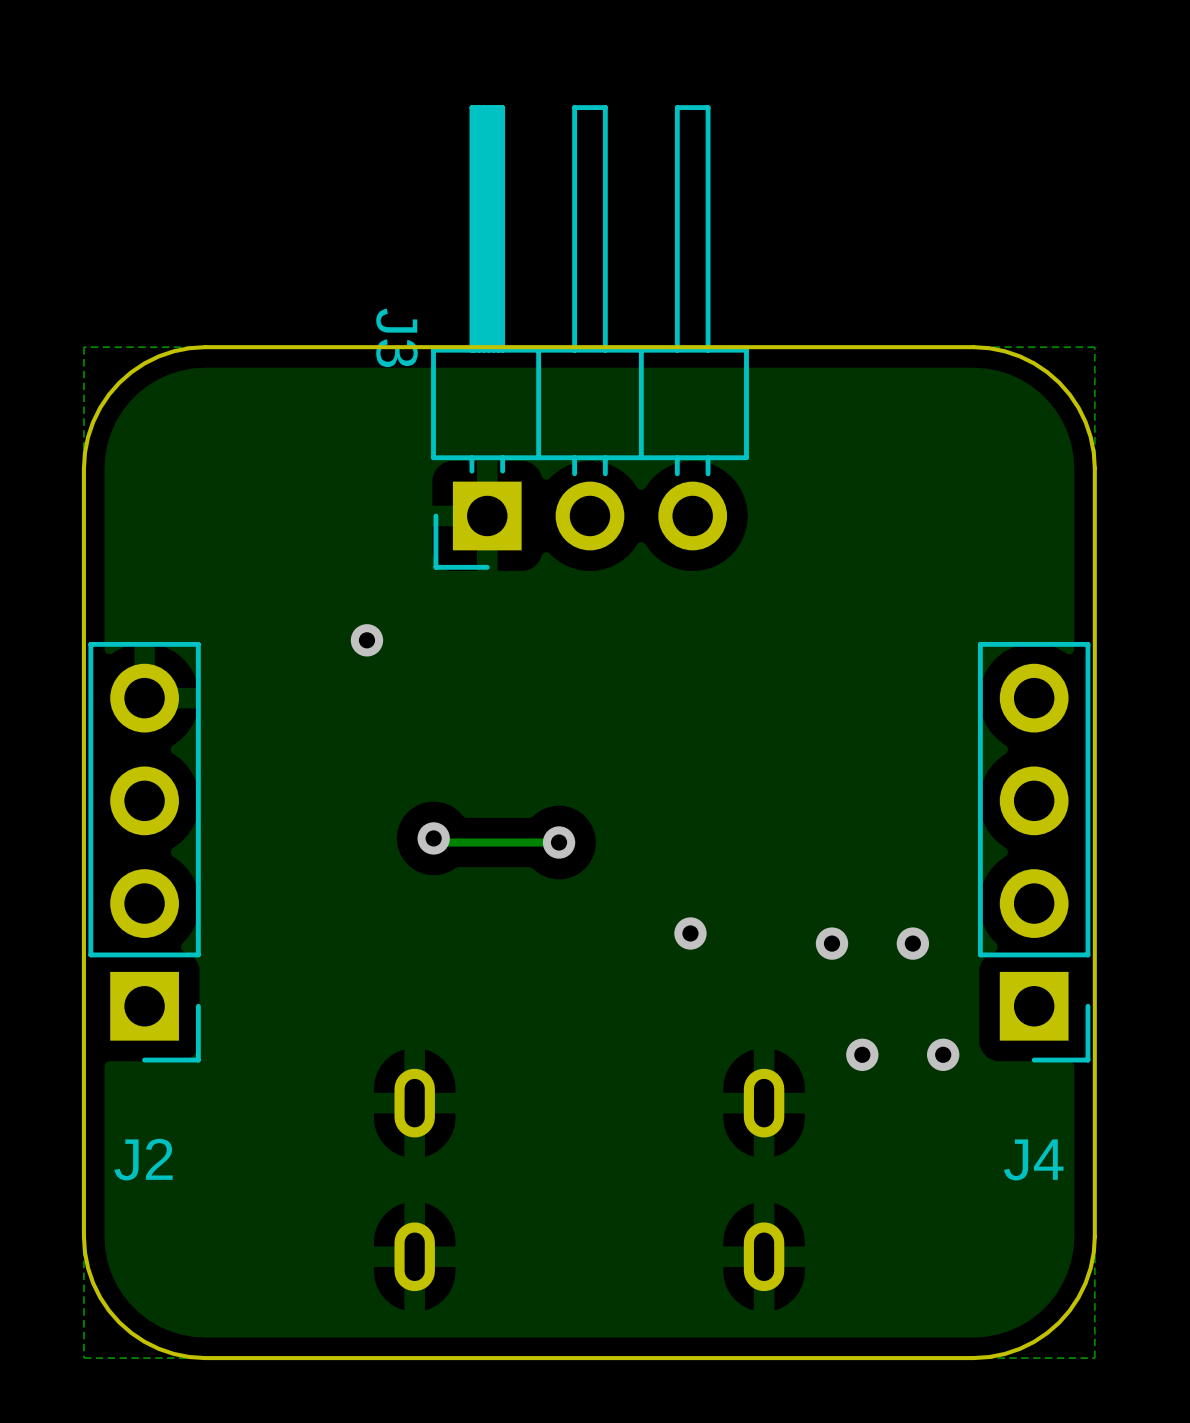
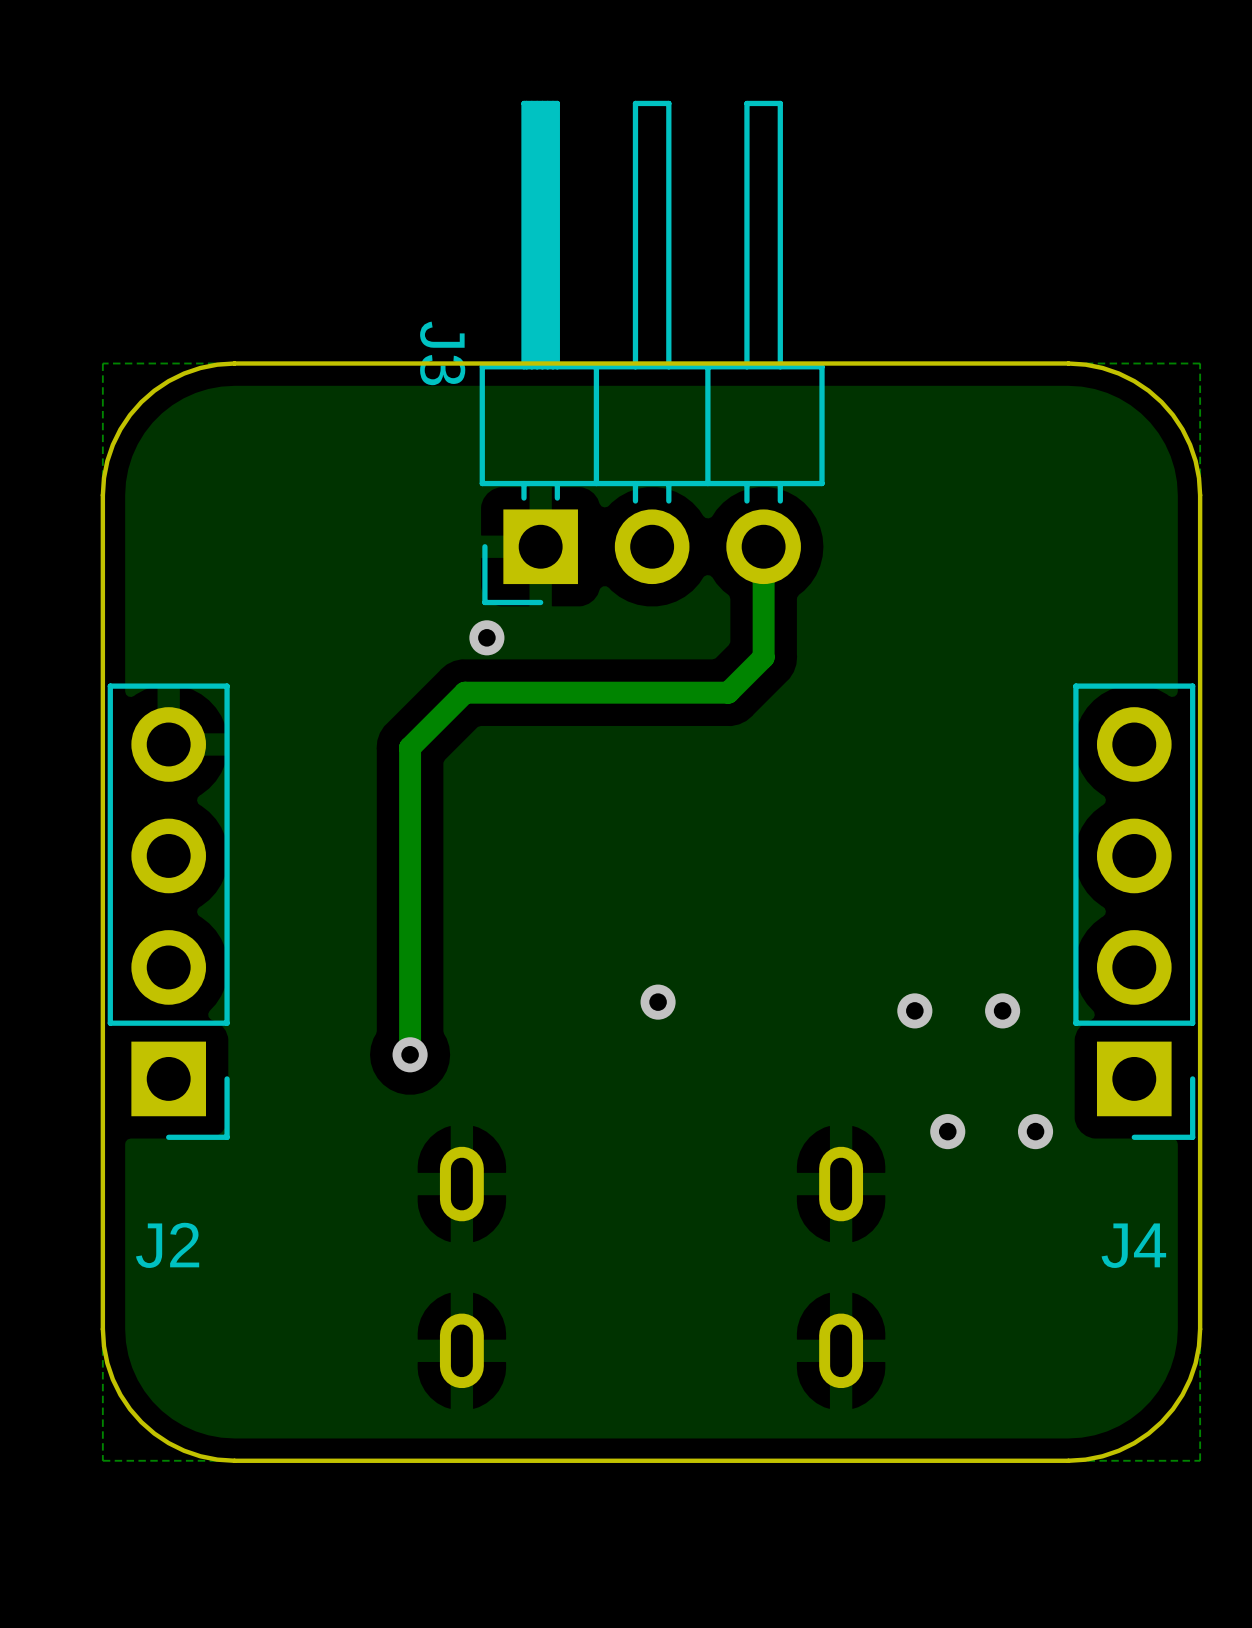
track: none -> (763, 546) (763, 657) (728, 692) (464, 692) (410, 747) (410, 1054)
via position: (366, 640) -> (486, 637)
track: (433, 838) (437, 842) (559, 842) -> none
via: (433, 838) -> none
via: (559, 842) -> none
via: (690, 933) -> none
via: none -> (658, 1002)
via: none -> (410, 1054)

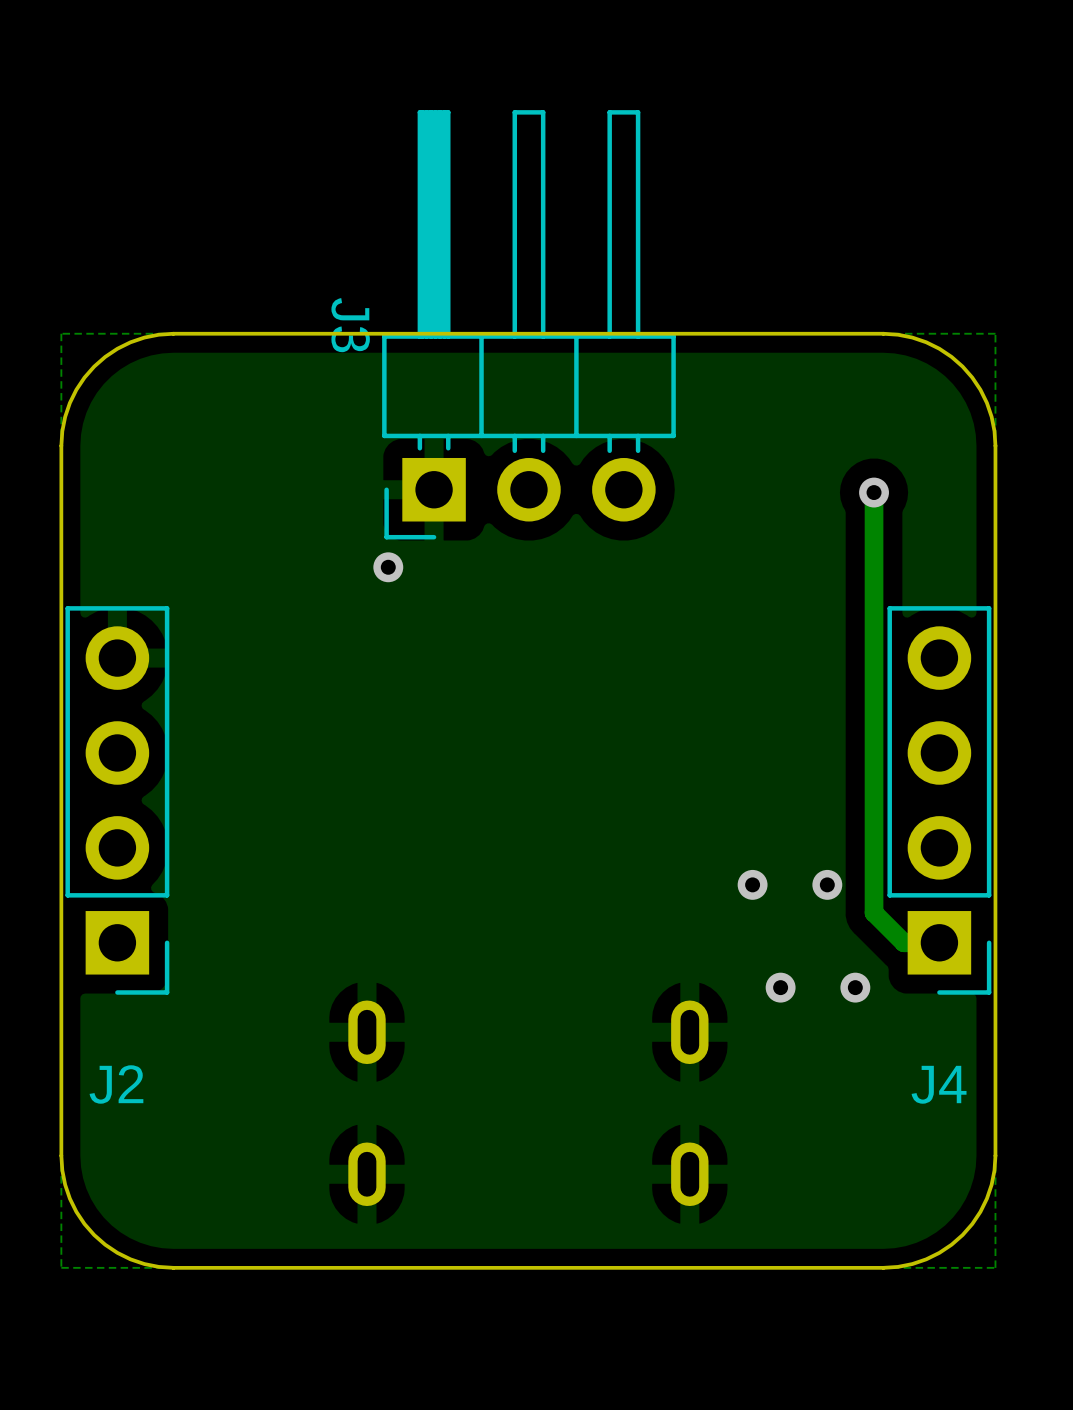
track: (763, 546) (763, 657) (728, 692) (464, 692) (410, 747) (410, 1054) -> none
track: none -> (874, 492) (874, 912) (903, 942) (939, 942)
via: none -> (874, 492)
via: (658, 1002) -> none
via: (410, 1054) -> none

